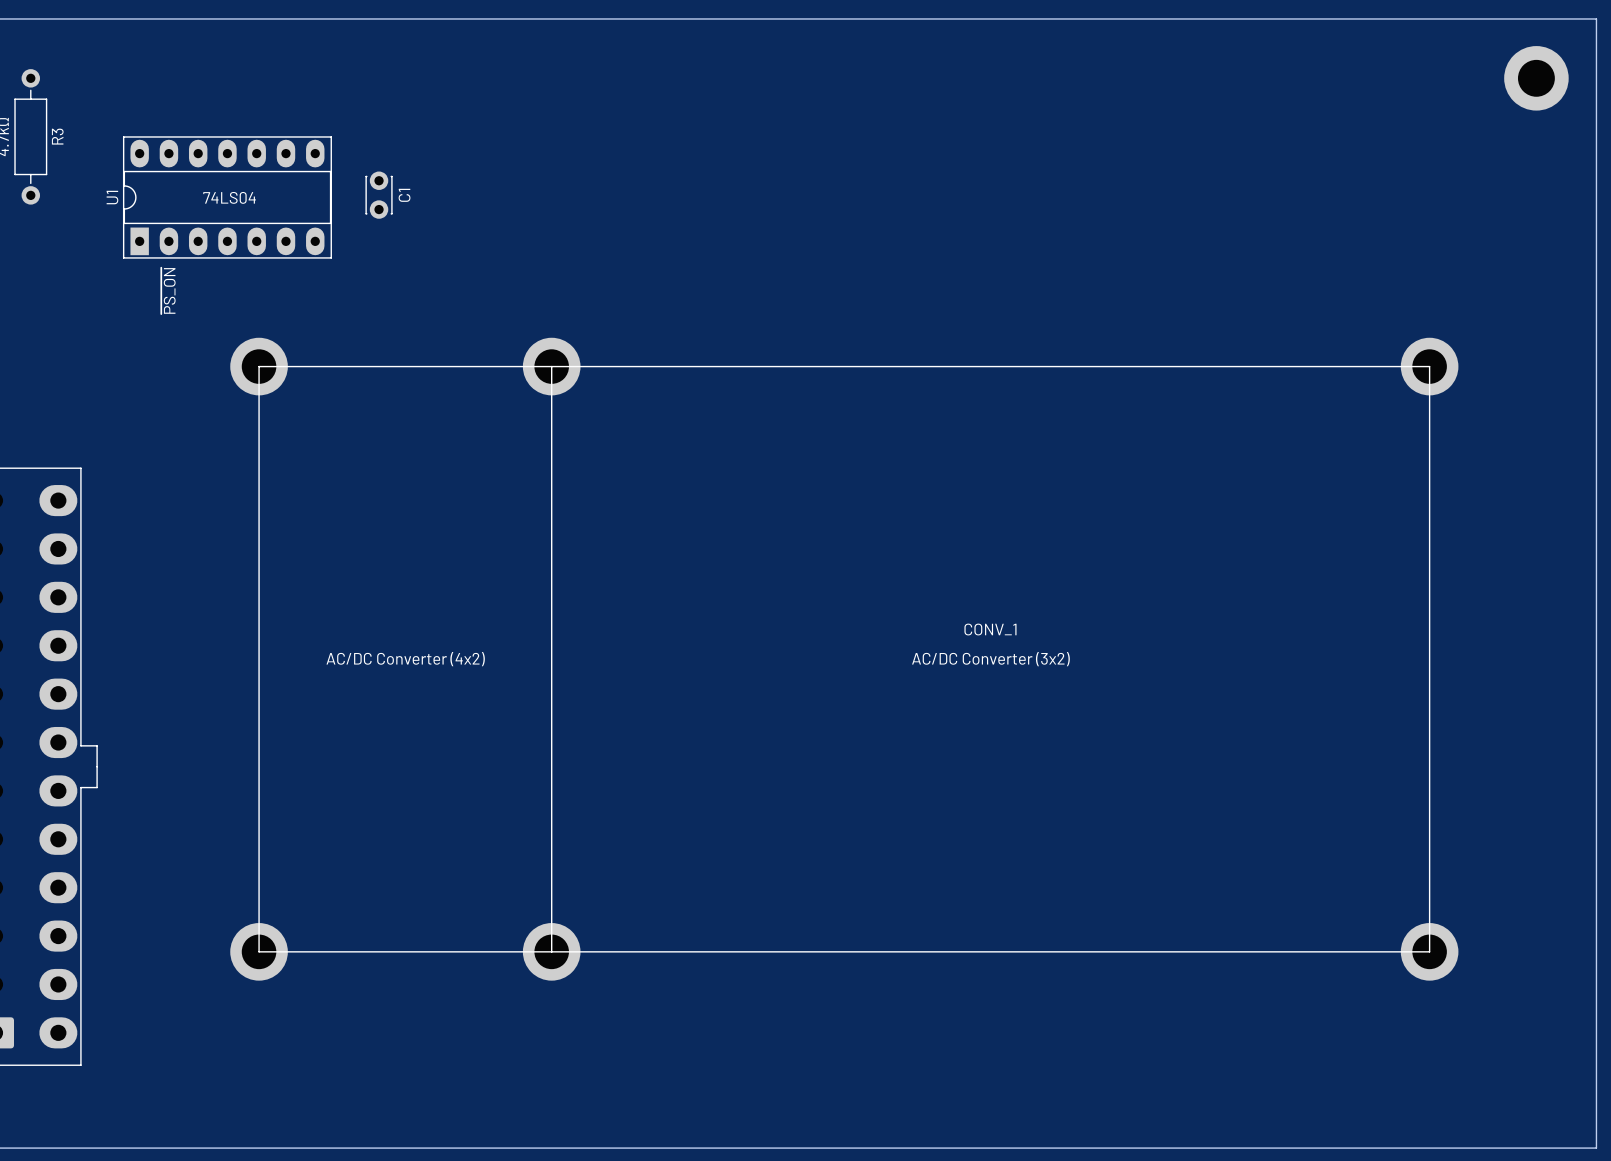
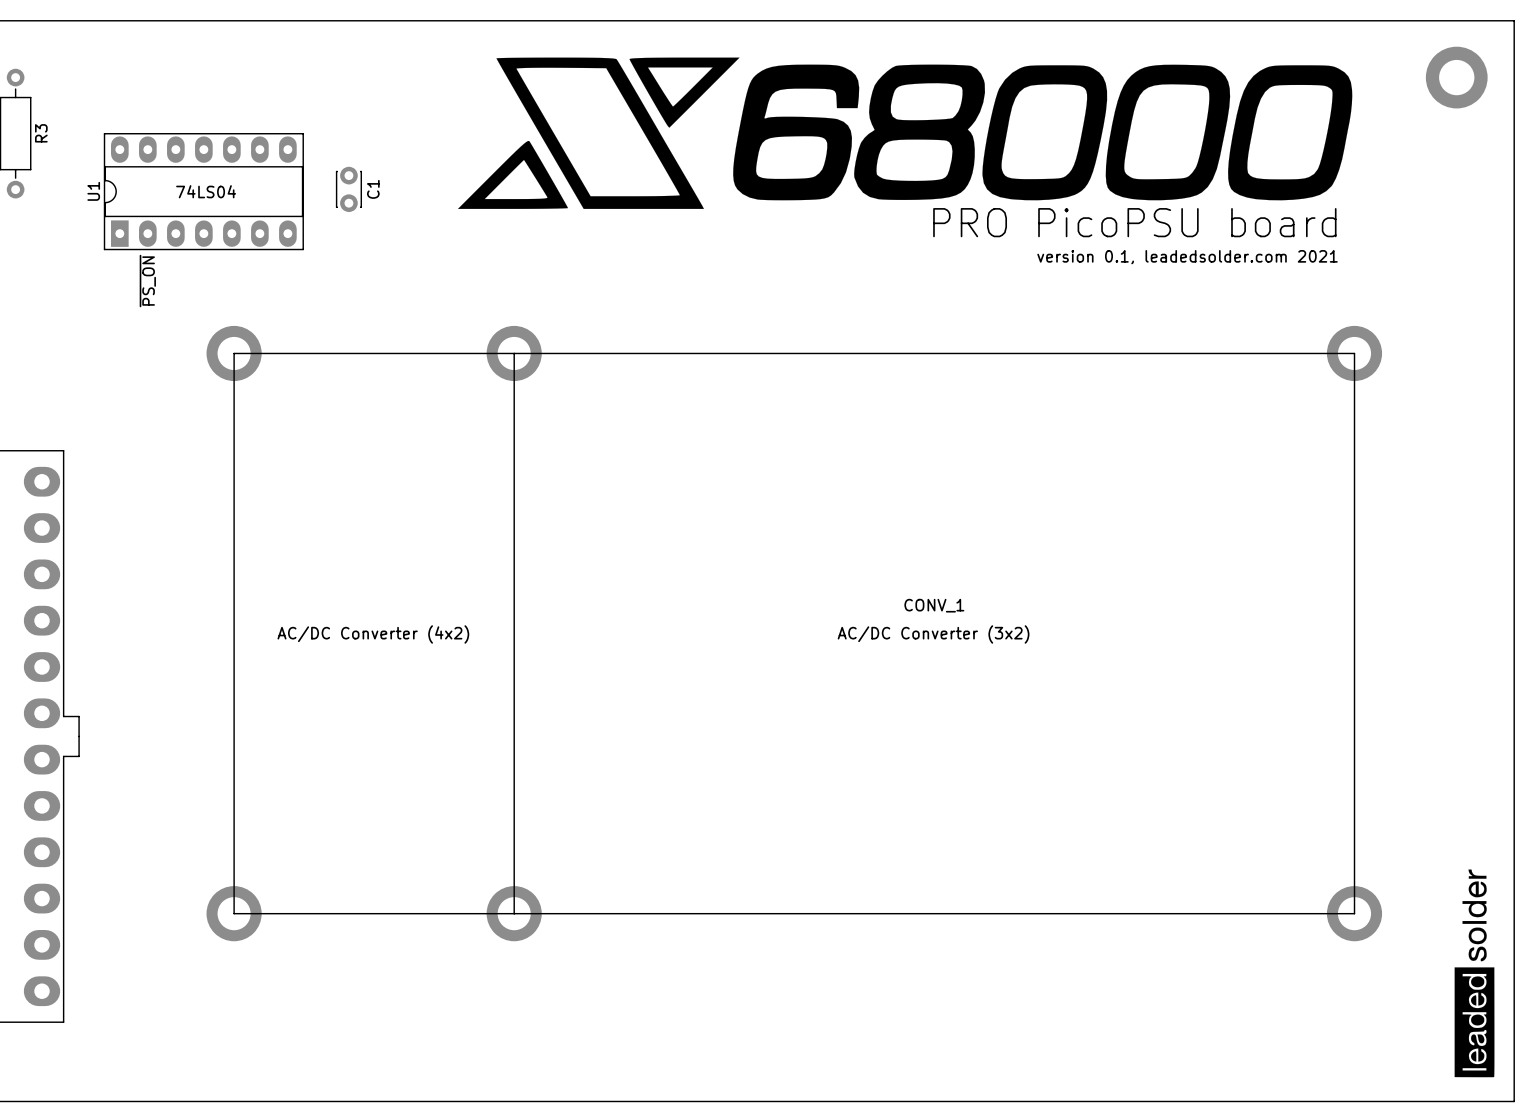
drawing: none -> [457, 57, 1353, 209]
text: none -> PRO PicoPSU board (1134, 222)
text: none -> version 0.1, leadedsolder.com 2021 (1187, 257)
drawing: none -> [1454, 869, 1495, 1078]

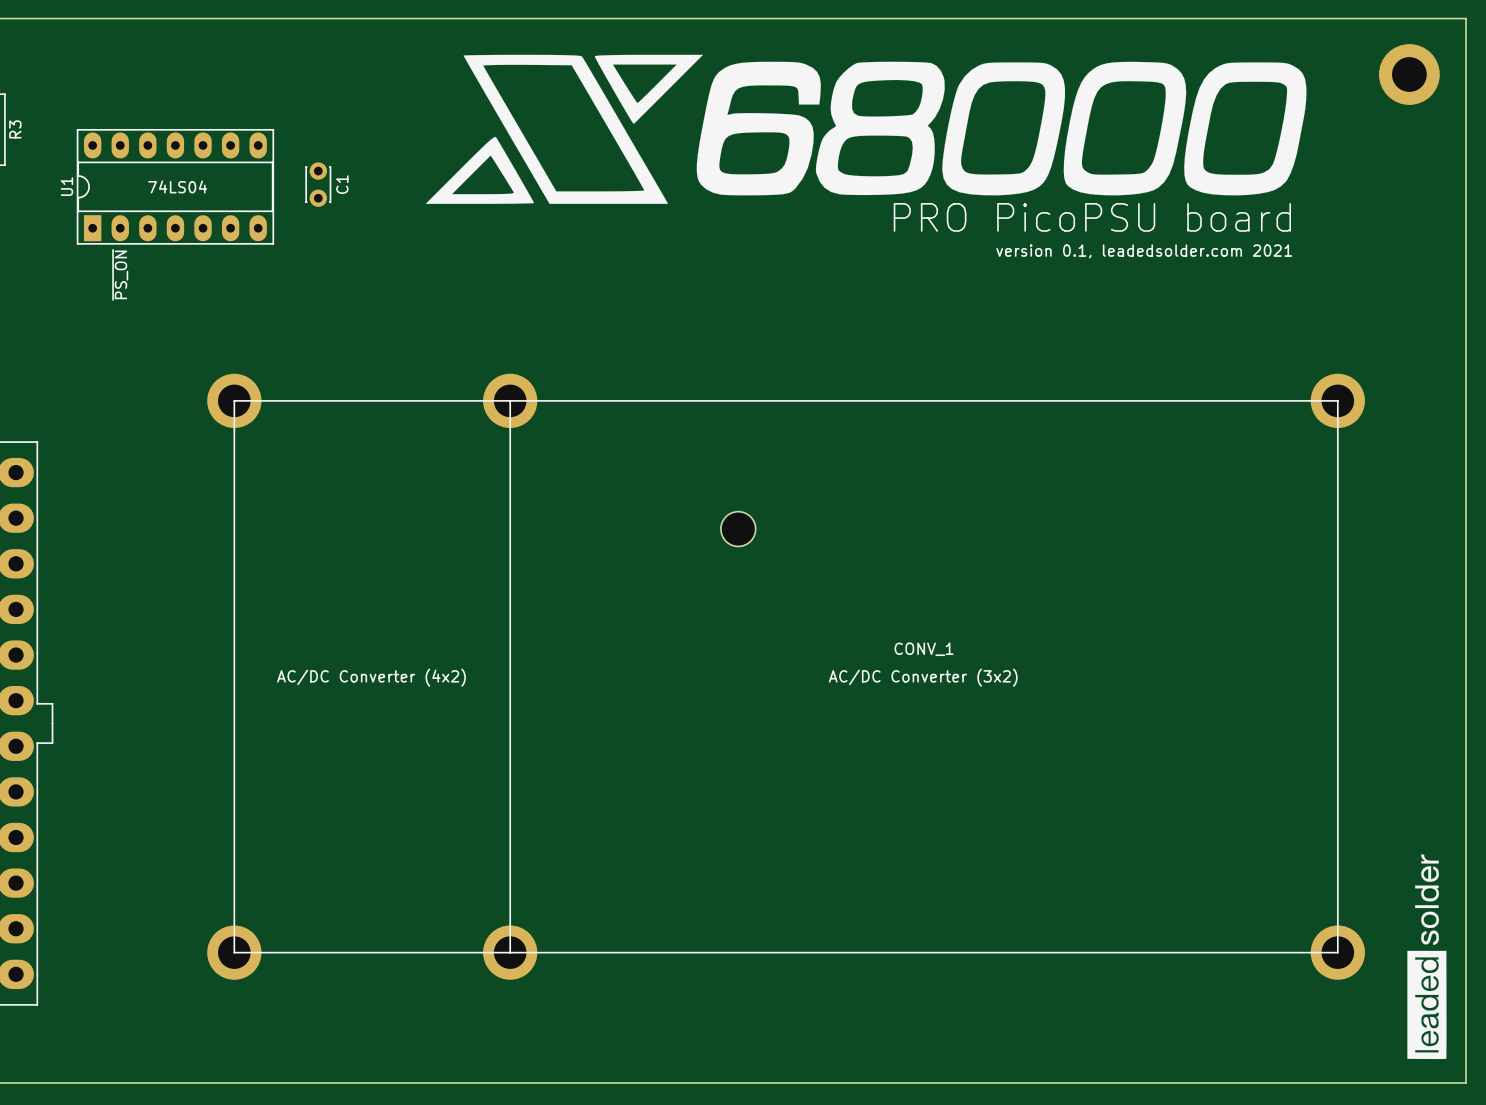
part: none -> (738, 529)
CONV_1 position: (794, 633) -> (786, 676)

